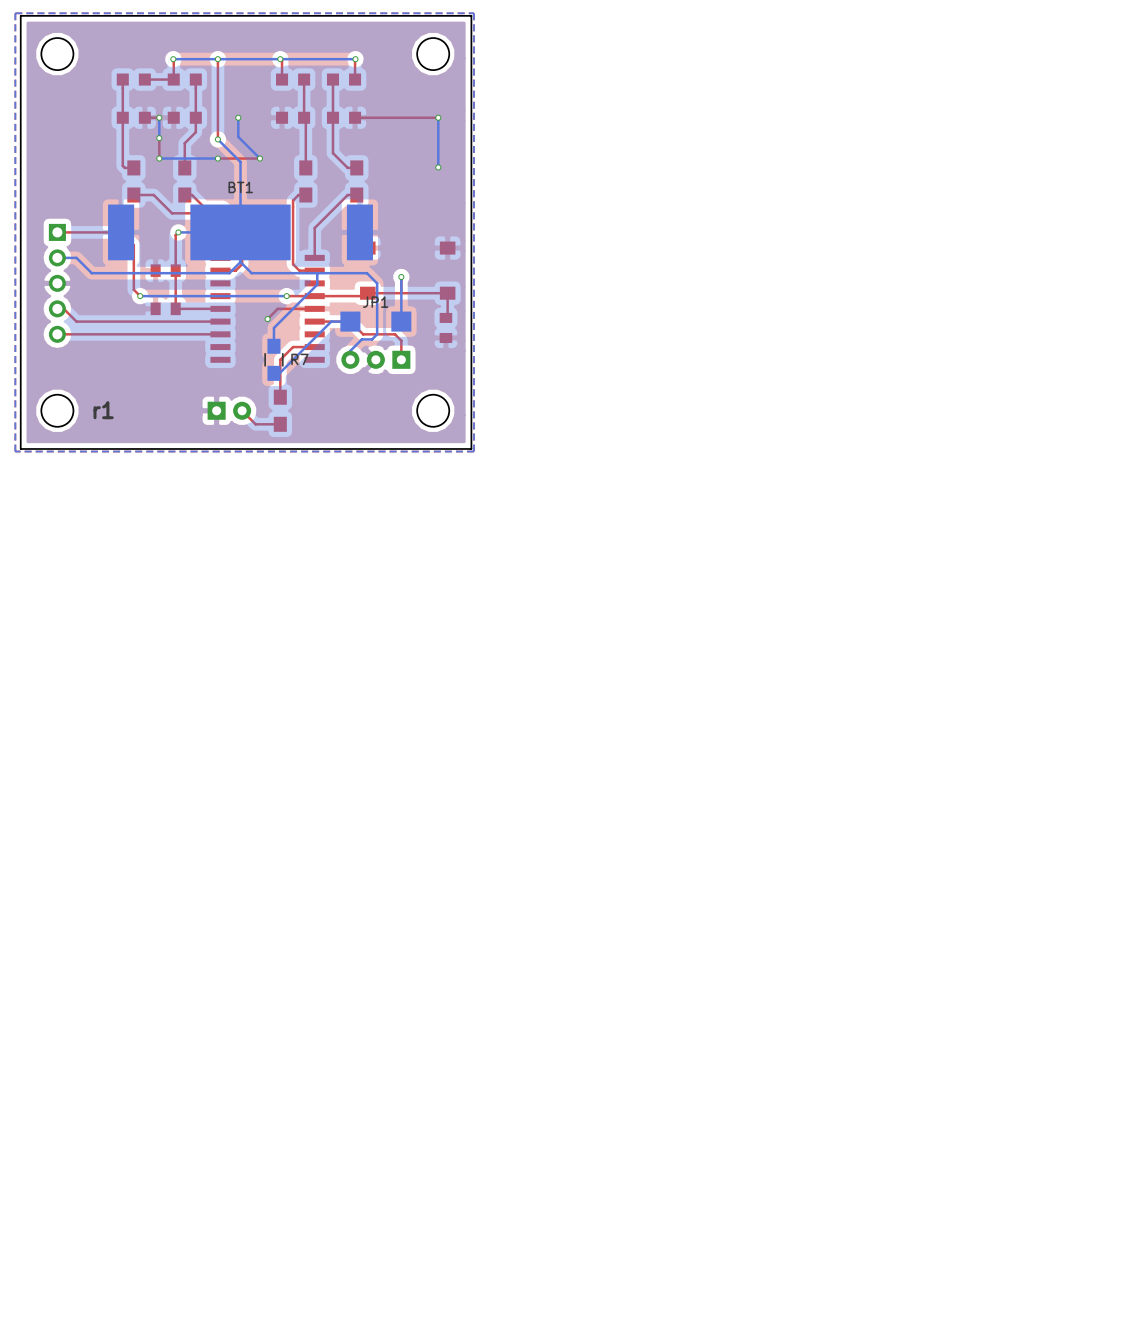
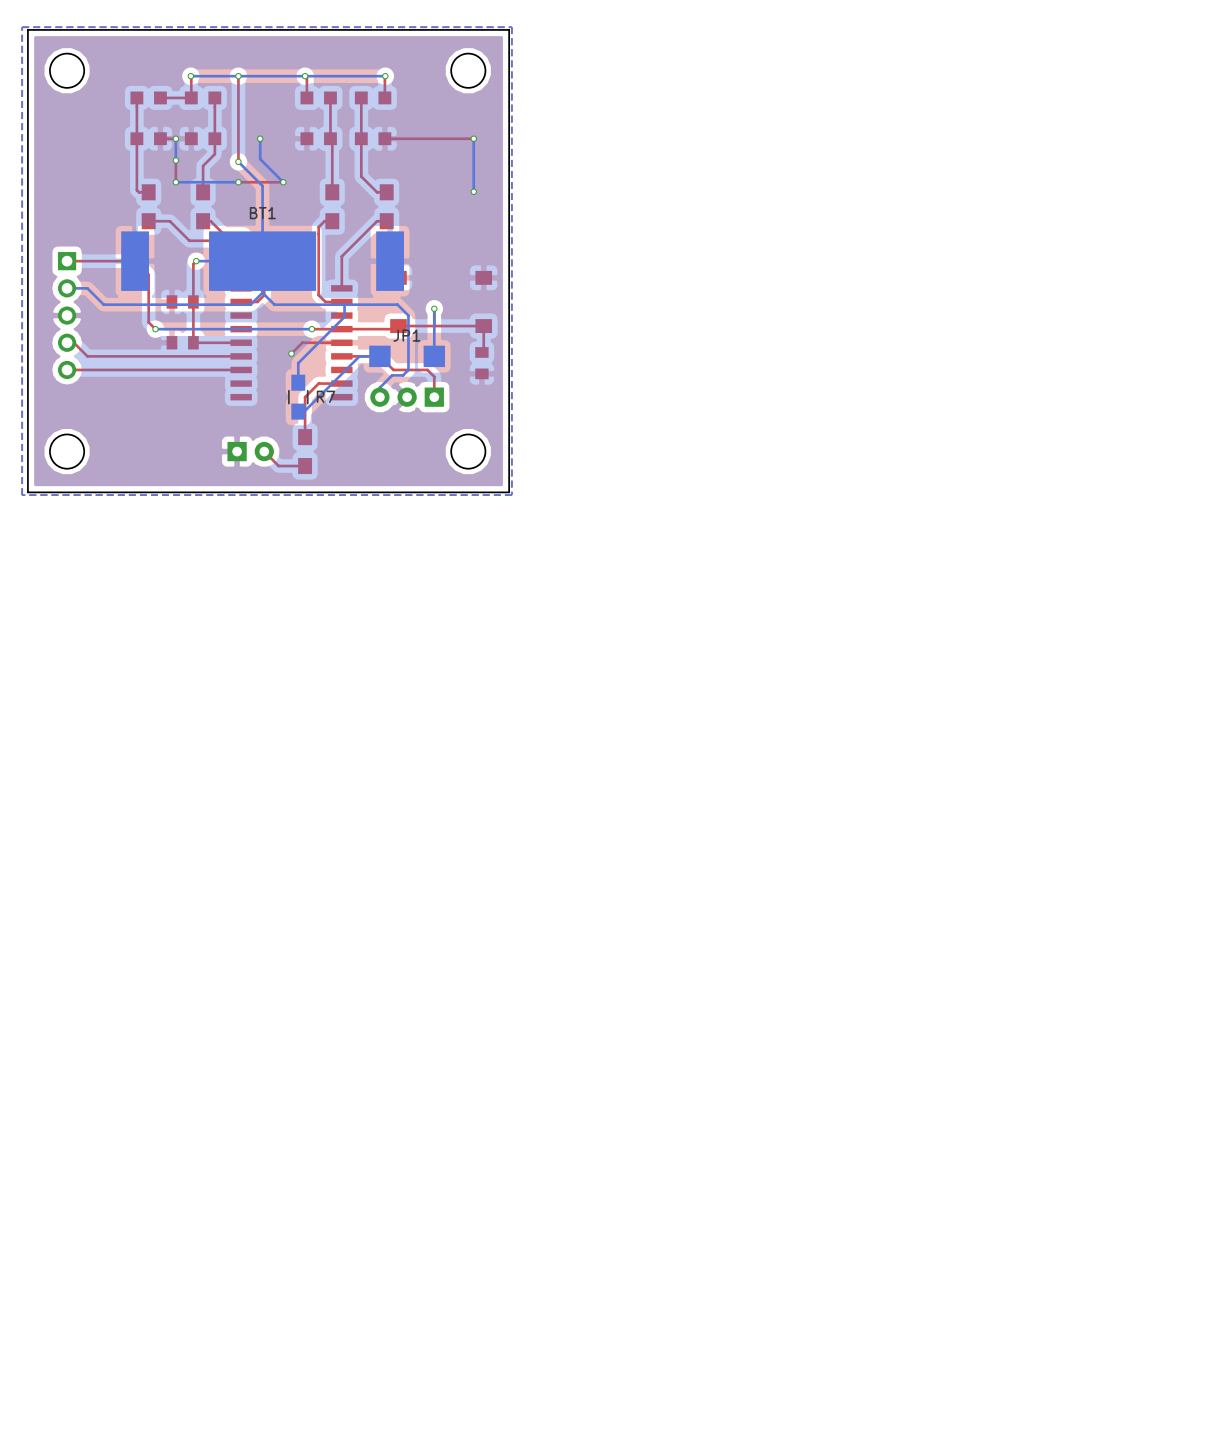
text: r1 (103, 410) -> none

